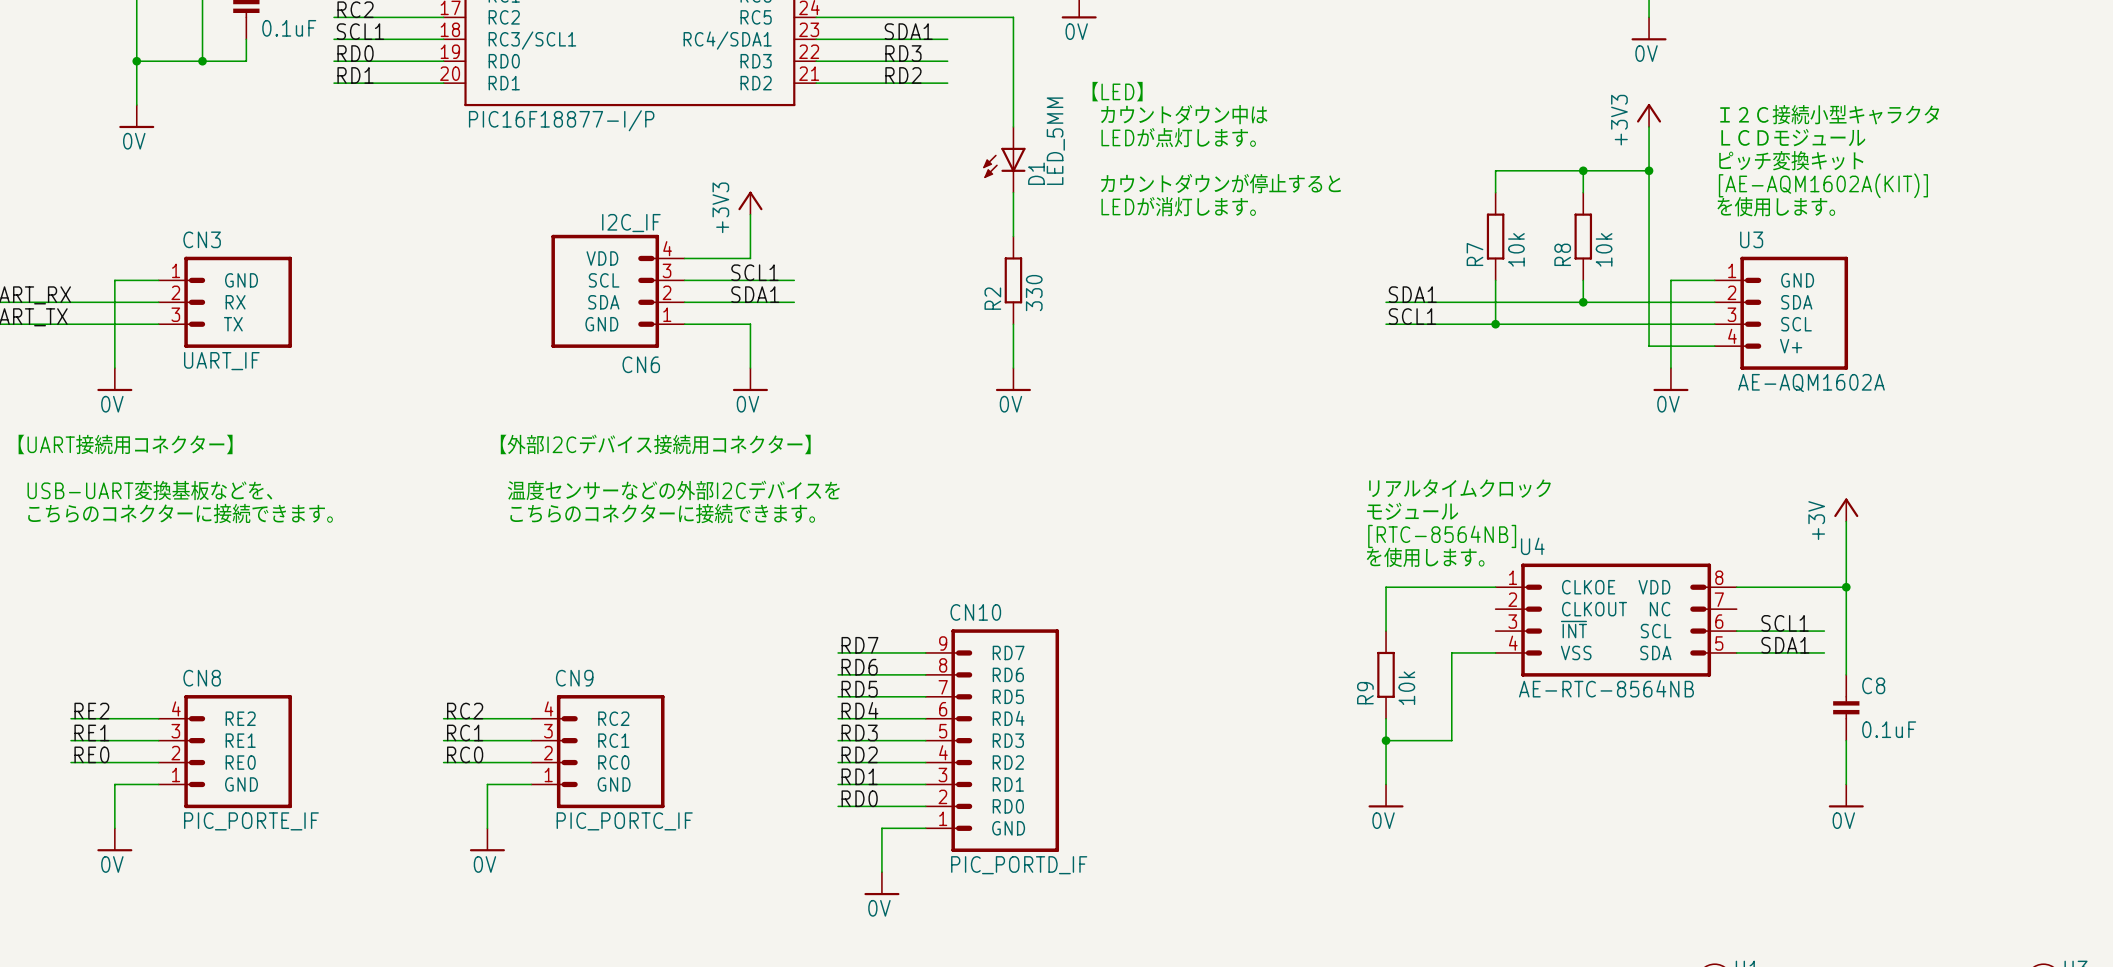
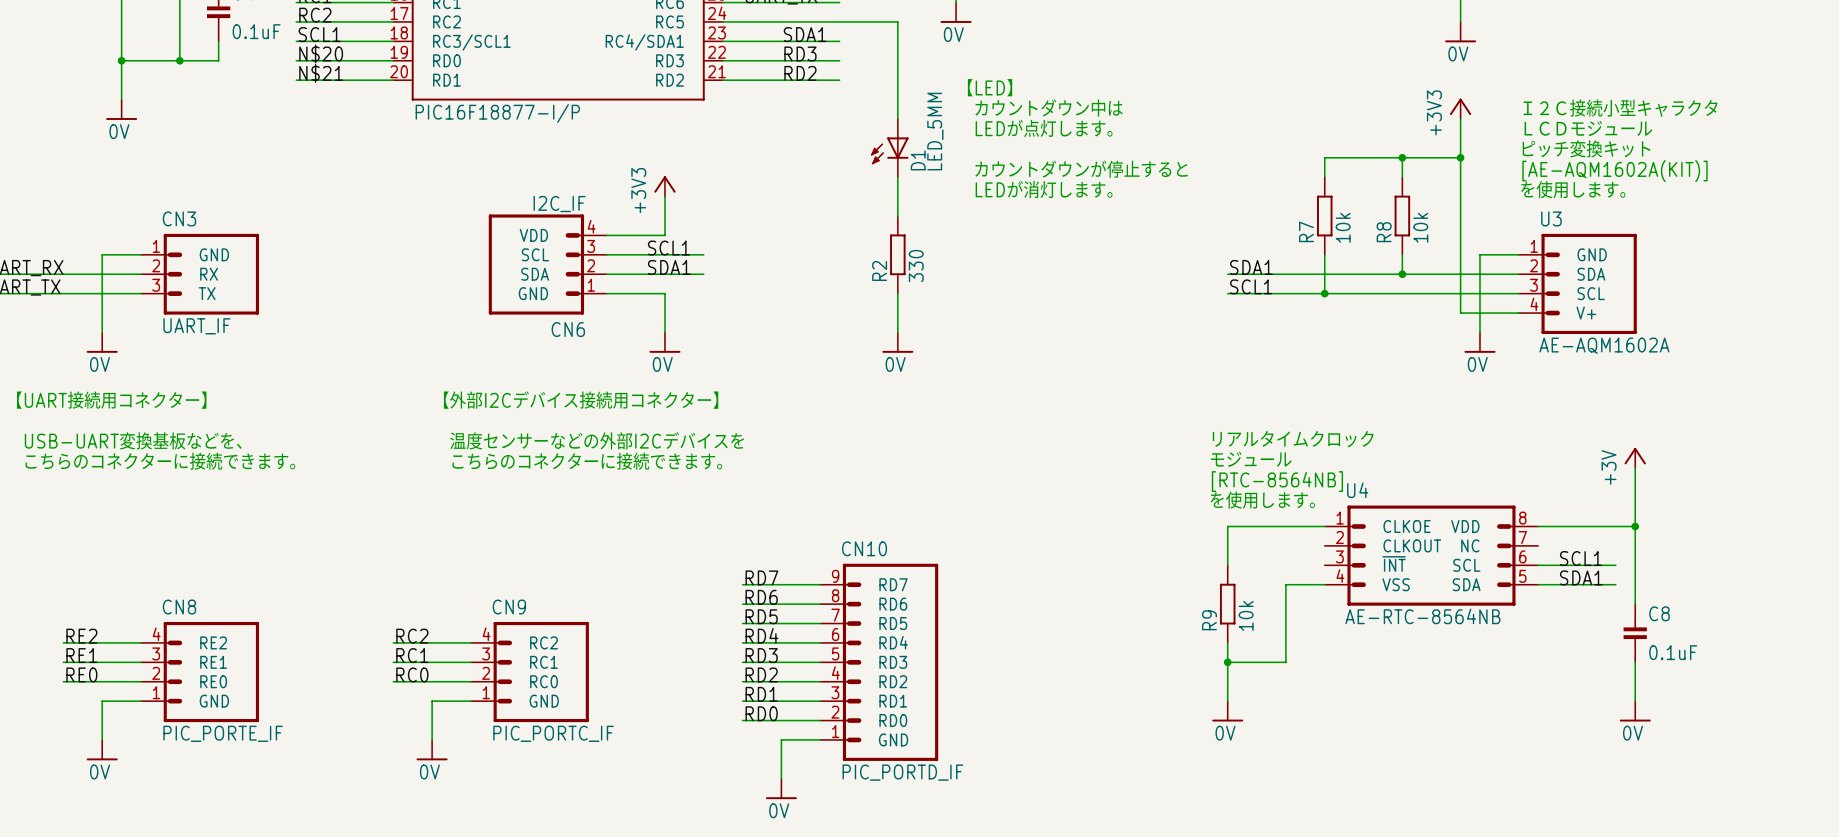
label: RD0 (355, 53) -> N$20 (321, 53)
label: RD1 (355, 75) -> N$21 (321, 73)

